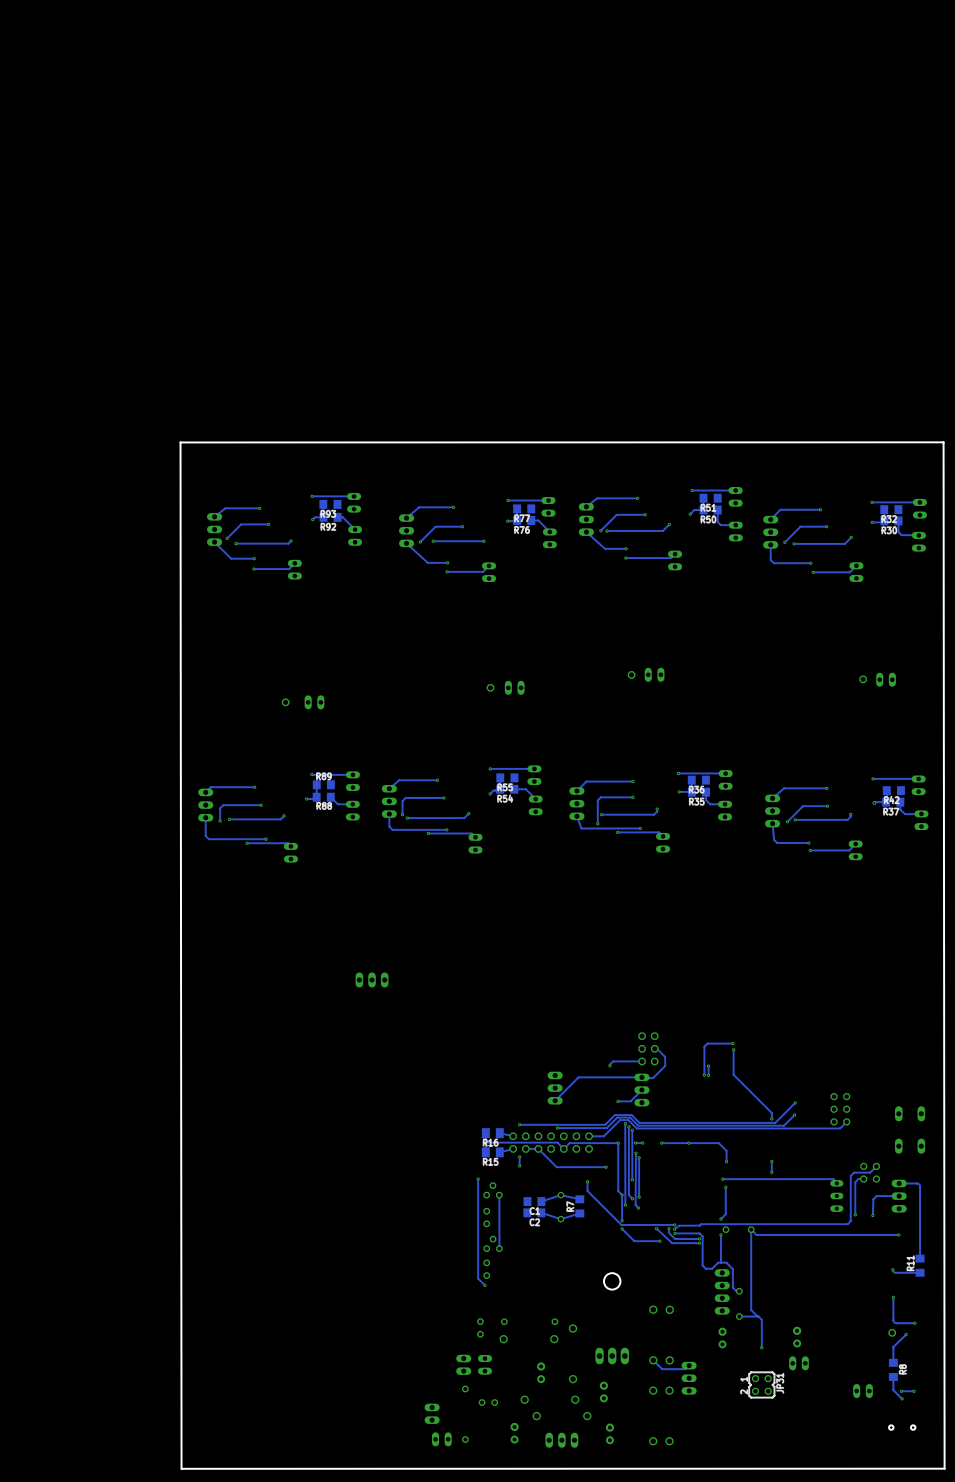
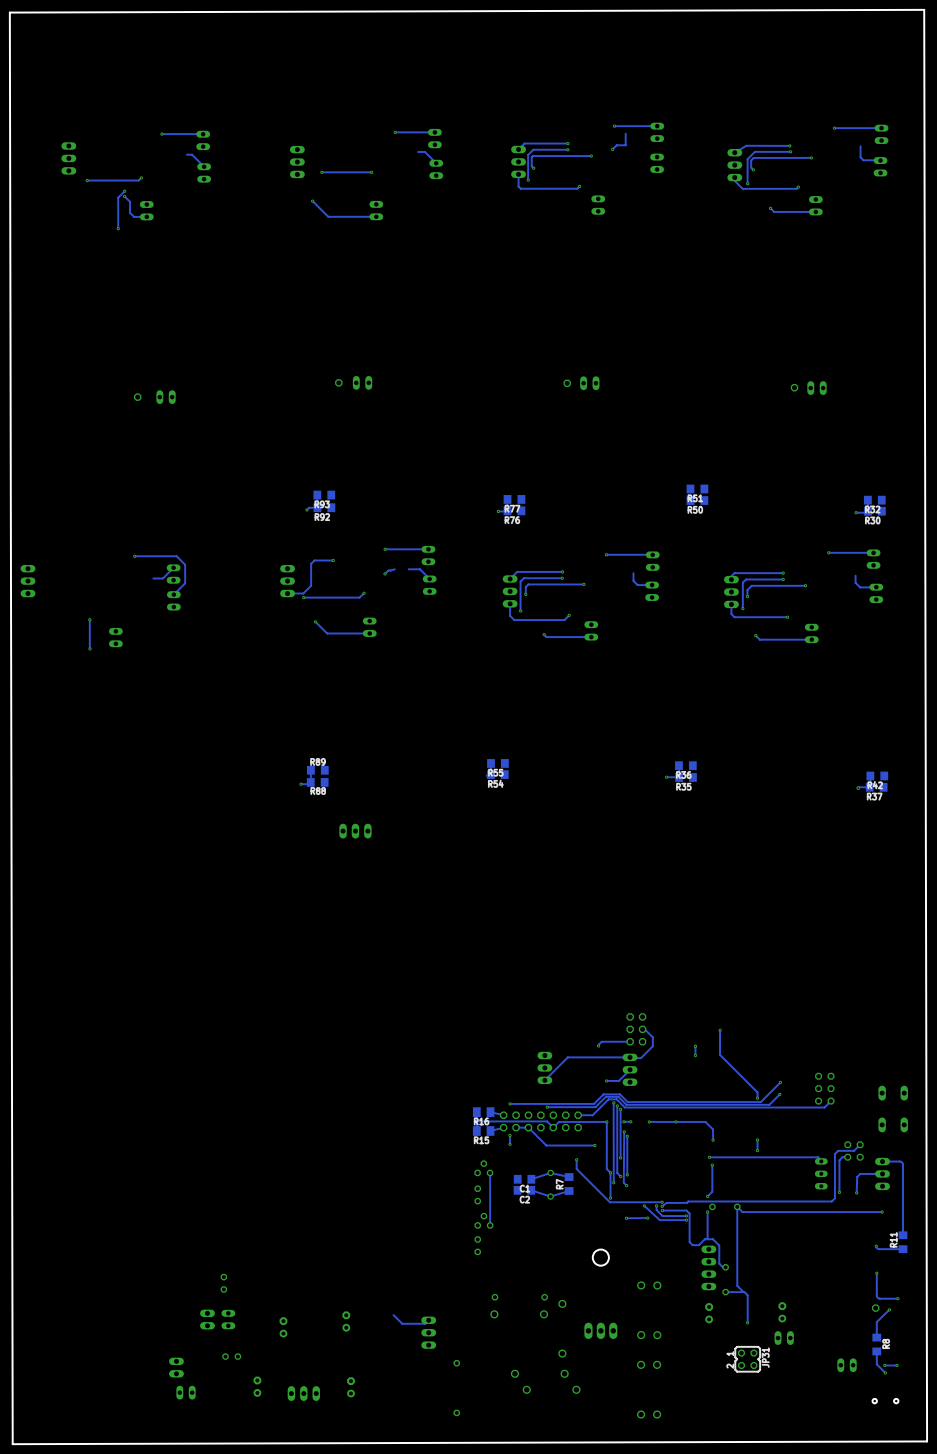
via: none -> (614, 126)
track: none -> (657, 126) (614, 126)
via: none -> (834, 128)
track: none -> (881, 128) (834, 128)
via: none -> (395, 132)
track: none -> (434, 132) (395, 132)
part: none -> (657, 132)
track: none -> (161, 134) (203, 134)
via: none -> (161, 134)
track: none -> (625, 133) (625, 145) (616, 145) (612, 149)
part: none -> (881, 134)
part: none -> (434, 138)
part: none -> (203, 140)
track: none -> (567, 143) (524, 143) (518, 149)
via: none -> (567, 143)
track: none -> (789, 145) (746, 145) (734, 152)
via: none -> (789, 145)
track: none -> (860, 146) (860, 157) (863, 160) (883, 160) (880, 160)
track: none -> (567, 149) (533, 149) (528, 154) (528, 180)
via: none -> (567, 149)
via: none -> (612, 149)
track: none -> (418, 151) (424, 151) (436, 163)
track: none -> (790, 151) (754, 151) (747, 159) (747, 183)
via: none -> (790, 151)
track: none -> (187, 154) (192, 154) (204, 166)
track: none -> (591, 156) (532, 156) (531, 166) (533, 168)
via: none -> (591, 156)
track: none -> (811, 157) (753, 157) (751, 160) (751, 167) (753, 169)
via: none -> (811, 157)
part: none -> (68, 158)
part: none -> (518, 161)
part: none -> (297, 162)
part: none -> (657, 163)
part: none -> (734, 165)
part: none -> (880, 166)
via: none -> (533, 168)
part: none -> (436, 169)
via: none -> (753, 169)
via: none -> (321, 172)
track: none -> (371, 172) (321, 172)
via: none -> (371, 172)
part: none -> (204, 172)
track: none -> (518, 174) (518, 186) (520, 188) (577, 188) (579, 186)
track: none -> (734, 177) (734, 180) (742, 188) (796, 188) (798, 187)
track: none -> (141, 177) (138, 180) (87, 180)
via: none -> (141, 177)
via: none -> (87, 180)
via: none -> (528, 180)
via: none -> (747, 183)
via: none -> (579, 186)
via: none -> (798, 187)
track: none -> (124, 191) (118, 197) (118, 228)
via: none -> (124, 191)
track: none -> (124, 196) (130, 201) (130, 212) (134, 216) (146, 216)
via: none -> (124, 196)
track: none -> (312, 201) (328, 216) (376, 216)
via: none -> (312, 201)
part: none -> (598, 205)
part: none -> (815, 205)
track: none -> (770, 208) (774, 211) (815, 211)
via: none -> (770, 208)
part: none -> (146, 210)
part: none -> (376, 210)
via: none -> (118, 228)
part: none -> (338, 382)
part: none -> (362, 382)
part: none -> (567, 383)
part: none -> (589, 383)
part: none -> (794, 387)
part: none -> (816, 388)
part: none -> (137, 397)
part: none -> (166, 397)
board edge: (943, 442) (180, 442) (181, 1468) (944, 1468) (943, 442) -> (924, 9) (927, 1441) (12, 1444) (9, 12) (924, 9)
via: (692, 490) -> none
track: (735, 490) (692, 490) -> none
track: (312, 496) (354, 496) -> none
via: (312, 496) -> none
part: (735, 496) -> none
track: (637, 498) (597, 498) (586, 506) -> none
via: (637, 498) -> none
track: (703, 498) (703, 509) (694, 509) (690, 514) -> none
via: (508, 500) -> none
track: (548, 500) (508, 500) -> none
part: (354, 502) -> none
via: (871, 502) -> none
track: (919, 502) (871, 502) -> none
part: (548, 506) -> none
track: (453, 507) (419, 507) (406, 518) -> none
via: (453, 507) -> none
track: (259, 508) (225, 508) (214, 516) -> none
via: (259, 508) -> none
part: (919, 508) -> none
track: (717, 509) (717, 522) (720, 525) (735, 525) -> none
track: (820, 509) (780, 509) (770, 519) -> none
via: (820, 509) -> none
track: (645, 514) (616, 514) (600, 530) -> none
via: (645, 514) -> none
via: (690, 514) -> none
track: (337, 517) (342, 517) (355, 529) -> none
part: (586, 519) -> none
track: (531, 520) (538, 520) (549, 532) -> none
track: (898, 520) (898, 532) (901, 535) (921, 535) (918, 535) -> none
track: (268, 524) (241, 524) (227, 538) -> none
via: (268, 524) -> none
track: (669, 524) (662, 530) (607, 530) -> none
via: (669, 524) -> none
track: (462, 526) (435, 526) (420, 541) -> none
via: (462, 526) -> none
track: (826, 526) (800, 526) (784, 542) -> none
via: (826, 526) -> none
part: (214, 529) -> none
part: (406, 530) -> none
via: (600, 530) -> none
via: (607, 530) -> none
part: (735, 531) -> none
track: (586, 532) (605, 548) (626, 548) -> none
part position: (770, 532) -> (731, 592)
part: (355, 535) -> none
track: (851, 537) (844, 543) (794, 543) -> none
via: (851, 537) -> none
via: (227, 538) -> none
part: (549, 538) -> none
track: (291, 540) (288, 543) (235, 543) -> none
via: (291, 540) -> none
via: (420, 541) -> none
via: (433, 541) -> none
track: (483, 541) (433, 541) -> none
via: (483, 541) -> none
part: (918, 541) -> none
track: (214, 542) (231, 558) (254, 558) -> none
via: (784, 542) -> none
via: (235, 543) -> none
track: (406, 543) (427, 562) (447, 562) -> none
via: (794, 543) -> none
track: (770, 544) (770, 560) (773, 563) (810, 563) -> none
via: (626, 548) -> none
track: (675, 554) (671, 558) (625, 558) -> none
via: (254, 558) -> none
via: (625, 558) -> none
via: none -> (385, 549)
track: none -> (428, 549) (385, 549)
part position: (675, 560) -> (652, 561)
via: (447, 562) -> none
track: (294, 563) (289, 569) (253, 569) -> none
via: (810, 563) -> none
track: none -> (828, 552) (873, 552)
via: none -> (828, 552)
track: (489, 565) (483, 571) (447, 571) -> none
track: none -> (606, 554) (652, 554)
via: none -> (606, 554)
track: (856, 565) (849, 572) (813, 572) -> none
track: none -> (134, 556) (176, 556) (185, 564) (185, 583) (173, 594)
via: none -> (134, 556)
part: none -> (428, 555)
via: (253, 569) -> none
part: (294, 569) -> none
part: none -> (873, 559)
track: none -> (333, 560) (314, 560) (311, 563) (311, 585) (303, 593) (287, 593)
via: none -> (333, 560)
via: (447, 571) -> none
part: (489, 572) -> none
via: (813, 572) -> none
part: (856, 572) -> none
track: none -> (173, 567) (162, 578) (153, 578)
track: none -> (394, 569) (388, 570) (385, 573)
track: none -> (408, 569) (420, 569) (429, 578)
track: none -> (562, 571) (517, 571) (510, 578)
via: none -> (562, 571)
track: none -> (633, 573) (633, 580) (637, 585) (652, 585)
track: none -> (783, 573) (734, 573) (731, 579)
via: none -> (783, 573)
part: none -> (173, 574)
via: none -> (385, 573)
track: none -> (855, 575) (855, 582) (860, 587) (876, 587)
track: none -> (562, 578) (523, 578) (520, 581) (520, 611)
via: none -> (562, 578)
track: none -> (783, 579) (745, 579) (742, 582) (742, 608)
via: none -> (783, 579)
part: none -> (28, 581)
part: none -> (287, 581)
track: none -> (583, 584) (528, 584) (525, 587) (525, 594)
via: none -> (583, 584)
part: none -> (429, 585)
track: none -> (805, 585) (751, 585) (747, 590) (747, 596)
via: none -> (805, 585)
part: none -> (510, 591)
part: none -> (652, 591)
track: none -> (364, 593) (359, 597) (303, 597)
via: none -> (364, 593)
part: none -> (876, 593)
via: none -> (525, 594)
via: none -> (747, 596)
via: none -> (303, 597)
part: none -> (173, 600)
track: none -> (510, 603) (510, 615) (514, 620) (564, 620) (569, 615)
track: none -> (731, 604) (731, 614) (734, 617) (787, 617)
via: none -> (742, 608)
via: none -> (520, 611)
via: none -> (569, 615)
via: none -> (787, 617)
track: none -> (89, 619) (90, 648)
via: none -> (89, 619)
track: none -> (315, 621) (327, 633) (369, 633)
via: none -> (315, 621)
part: none -> (369, 627)
part: none -> (591, 630)
part: none -> (811, 633)
track: none -> (544, 634) (546, 637) (591, 637)
via: none -> (544, 634)
track: none -> (755, 635) (759, 639) (811, 639)
via: none -> (755, 635)
part: none -> (115, 637)
via: none -> (90, 648)
part: (631, 674) -> none
part: (654, 674) -> none
part: (863, 679) -> none
part: (886, 679) -> none
part: (490, 687) -> none
part: (514, 687) -> none
part: (285, 702) -> none
part: (314, 702) -> none
via: (490, 768) -> none
track: (534, 768) (490, 768) -> none
track: (678, 773) (725, 773) -> none
via: (678, 773) -> none
track: (311, 774) (352, 774) -> none
via: (311, 774) -> none
part: (534, 775) -> none
track: (873, 778) (918, 779) -> none
via: (873, 778) -> none
part: (725, 779) -> none
track: (437, 780) (399, 780) (389, 788) -> none
via: (437, 780) -> none
part: (352, 781) -> none
track: (632, 781) (586, 781) (576, 791) -> none
via: (632, 781) -> none
part: (918, 785) -> none
track: (254, 787) (210, 787) (205, 792) -> none
via: (254, 787) -> none
track: (826, 788) (784, 788) (772, 798) -> none
via: (826, 788) -> none
track: (500, 789) (493, 790) (490, 793) -> none
track: (514, 789) (525, 789) (535, 799) -> none
track: (706, 792) (706, 800) (710, 804) (725, 804) -> none
via: (490, 793) -> none
track: (330, 797) (337, 804) (352, 804) -> none
track: (443, 797) (405, 797) (402, 801) (402, 814) -> none
via: (443, 797) -> none
track: (632, 797) (600, 797) (597, 800) (597, 823) -> none
via: (632, 797) -> none
part rotation: 0° (389, 801) -> 90° clockwise (355, 831)
part position: (389, 801) -> (355, 831)
track: (900, 802) (900, 809) (905, 814) (921, 813) -> none
part: (576, 803) -> none
part: (205, 805) -> none
track: (261, 805) (223, 805) (220, 808) (220, 821) -> none
via: (261, 805) -> none
part: (535, 805) -> none
track: (827, 806) (803, 806) (787, 821) -> none
via: (827, 806) -> none
track: (657, 809) (654, 814) (601, 814) -> none
via: (657, 809) -> none
part: (352, 810) -> none
part: (725, 810) -> none
part: (772, 811) -> none
track: (468, 813) (464, 818) (407, 818) -> none
via: (468, 813) -> none
track: (389, 814) (389, 826) (392, 829) (446, 829) -> none
via: (402, 814) -> none
via: (601, 814) -> none
track: (850, 814) (847, 819) (795, 819) -> none
via: (850, 814) -> none
track: (284, 815) (280, 819) (229, 819) -> none
via: (284, 815) -> none
track: (576, 816) (581, 828) (640, 828) -> none
track: (205, 817) (205, 836) (208, 839) (266, 839) -> none
via: (407, 818) -> none
via: (229, 819) -> none
via: (795, 819) -> none
part: (921, 820) -> none
via: (220, 821) -> none
via: (787, 821) -> none
via: (597, 823) -> none
track: (772, 823) (774, 839) (777, 843) (808, 843) -> none
via: (640, 828) -> none
via: (446, 829) -> none
track: (617, 832) (659, 832) (663, 836) -> none
via: (617, 832) -> none
track: (428, 833) (471, 833) (475, 837) -> none
via: (428, 833) -> none
via: (266, 839) -> none
part: (663, 842) -> none
track: (247, 843) (287, 843) (290, 846) -> none
via: (247, 843) -> none
part: (475, 843) -> none
via: (808, 843) -> none
track: (855, 844) (849, 850) (810, 850) -> none
via: (810, 850) -> none
part: (855, 850) -> none
part: (290, 852) -> none
part: (372, 979) -> none
track: (733, 1043) (707, 1043) (704, 1046) (704, 1075) -> none
via: (733, 1043) -> none
via: (704, 1075) -> none
track: (478, 1179) (478, 1278) (484, 1285) -> none
via: (478, 1179) -> none
track: (622, 1228) (634, 1241) (660, 1241) -> (626, 1218) (647, 1218)
via position: (622, 1228) -> (626, 1218)
via: (484, 1285) -> none
part: none -> (223, 1283)
part: (480, 1327) -> none
track: none -> (393, 1315) (402, 1323) (425, 1323) (428, 1320)
part: none -> (207, 1319)
part: none -> (228, 1319)
part: none -> (346, 1321)
part: none -> (283, 1327)
part: none -> (428, 1332)
track: (653, 1360) (662, 1369) (685, 1369) (689, 1365) -> none
part: (463, 1364) -> none
part: (484, 1364) -> none
part: (541, 1372) -> none
part: (689, 1378) -> none
part: none -> (231, 1356)
part: (603, 1392) -> none
part: none -> (176, 1367)
part: (488, 1402) -> none
part: none -> (257, 1386)
part: none -> (350, 1387)
part: (432, 1413) -> none
part: none -> (186, 1392)
part: none -> (303, 1393)
part: (514, 1433) -> none
part: (609, 1433) -> none
part: (441, 1439) -> none
part: (561, 1440) -> none

